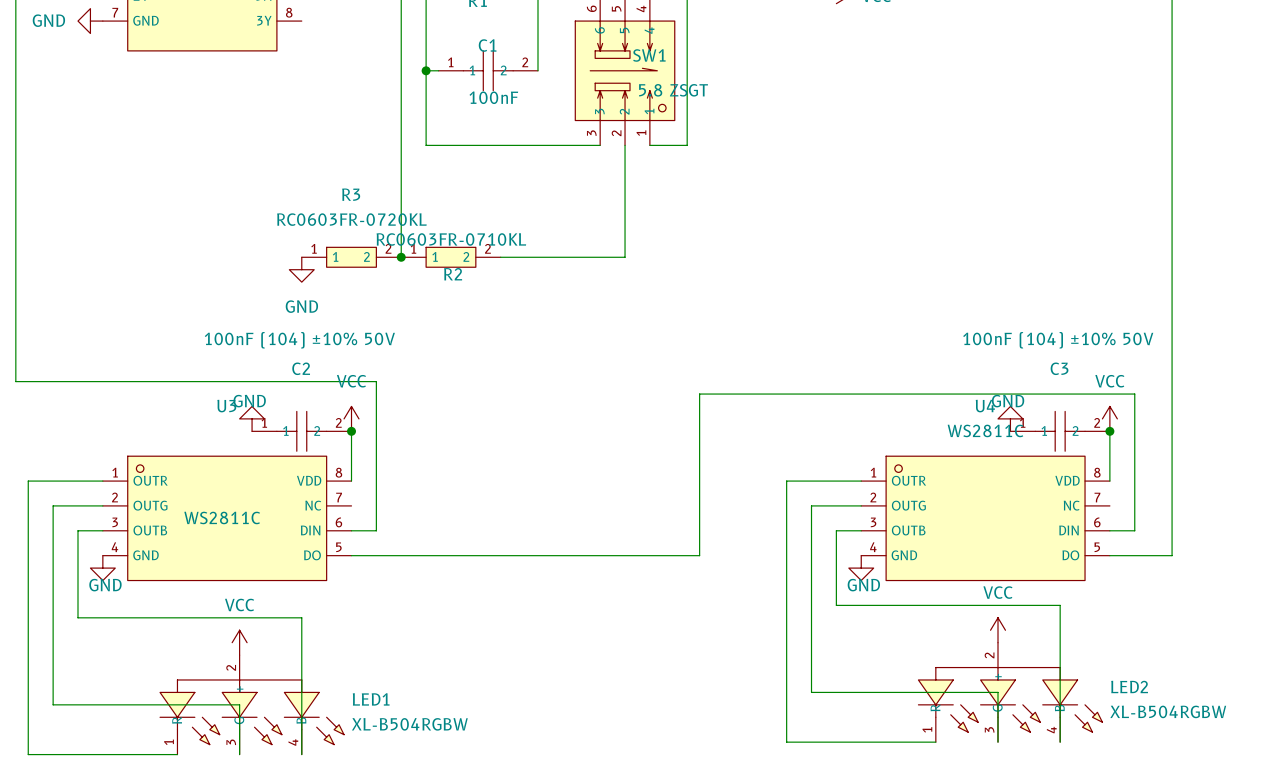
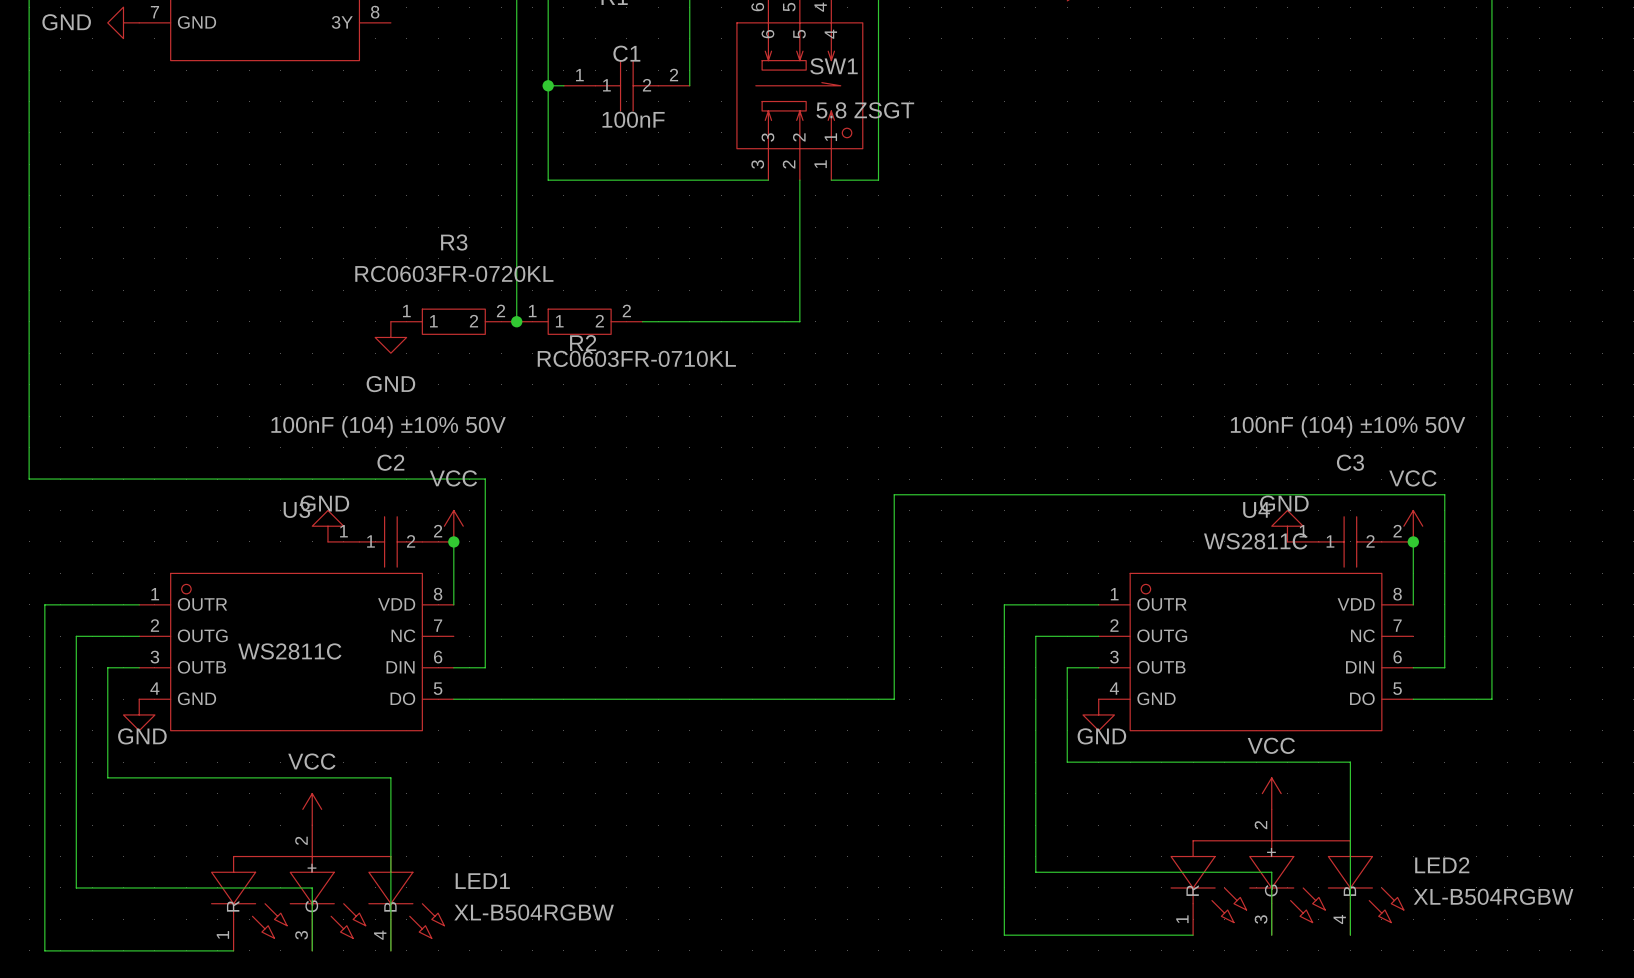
R2 value position: RC0603FR-0710KL (451, 239) -> RC0603FR-0710KL (636, 358)

